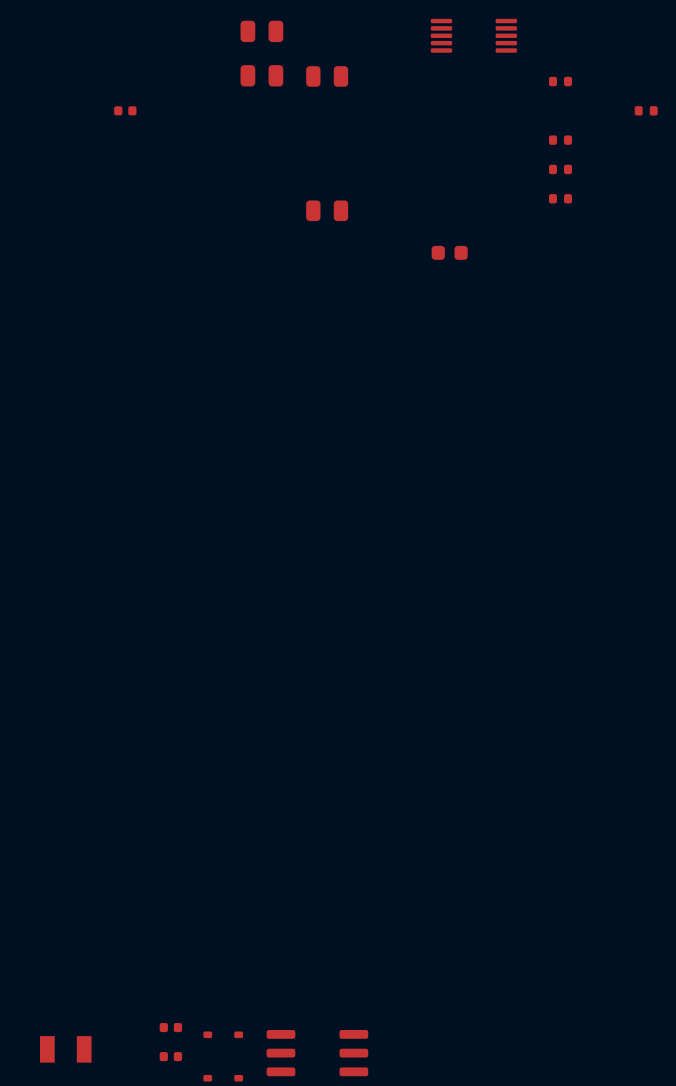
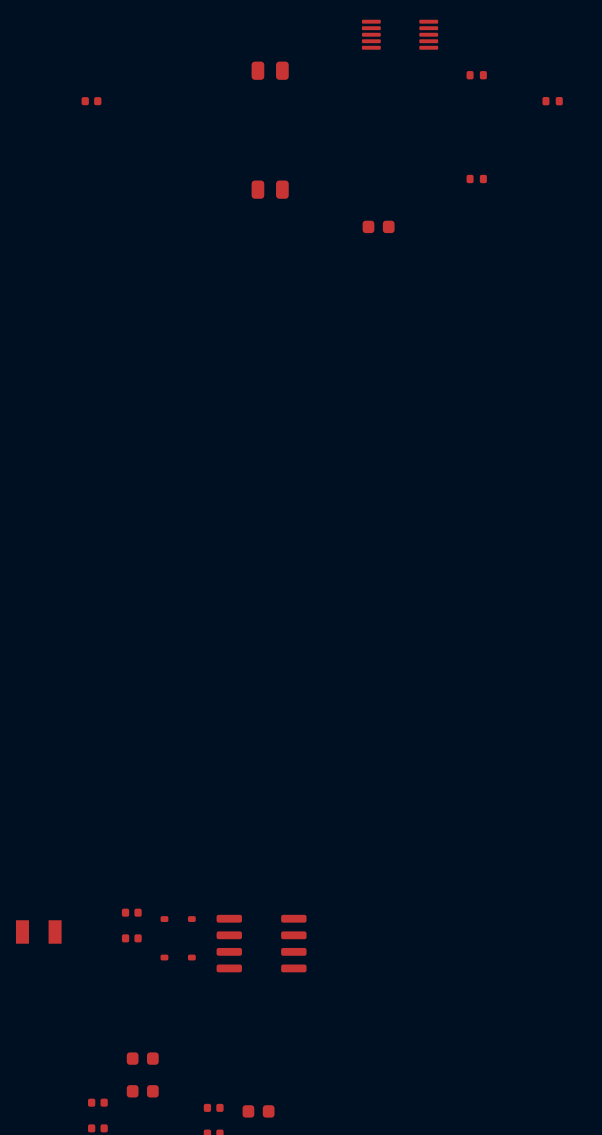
part: (261, 31) -> none
part: (261, 75) -> none
part: (560, 140) -> none
part: (560, 169) -> none

